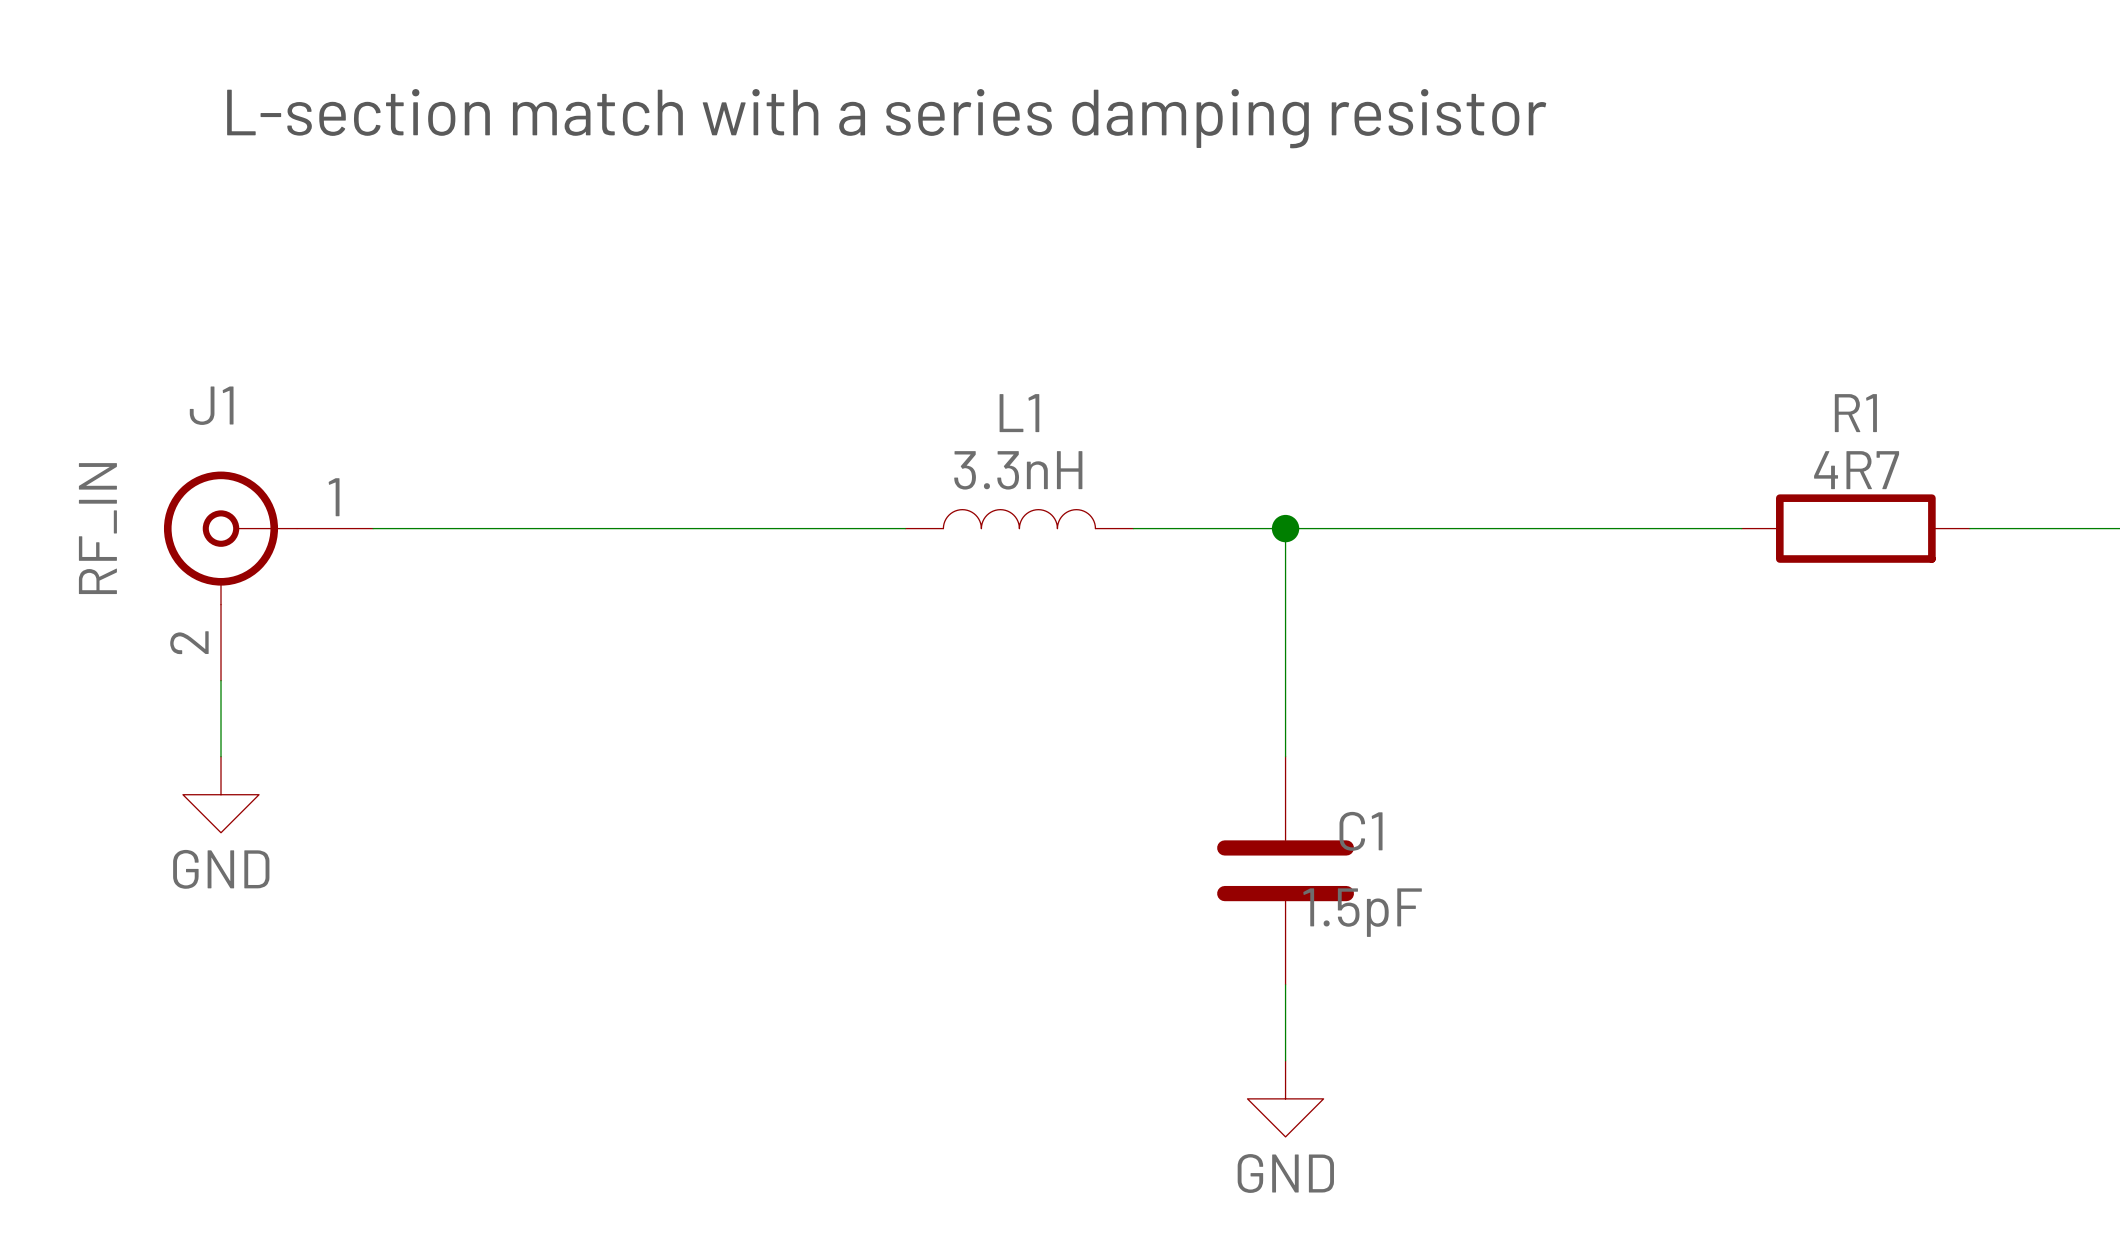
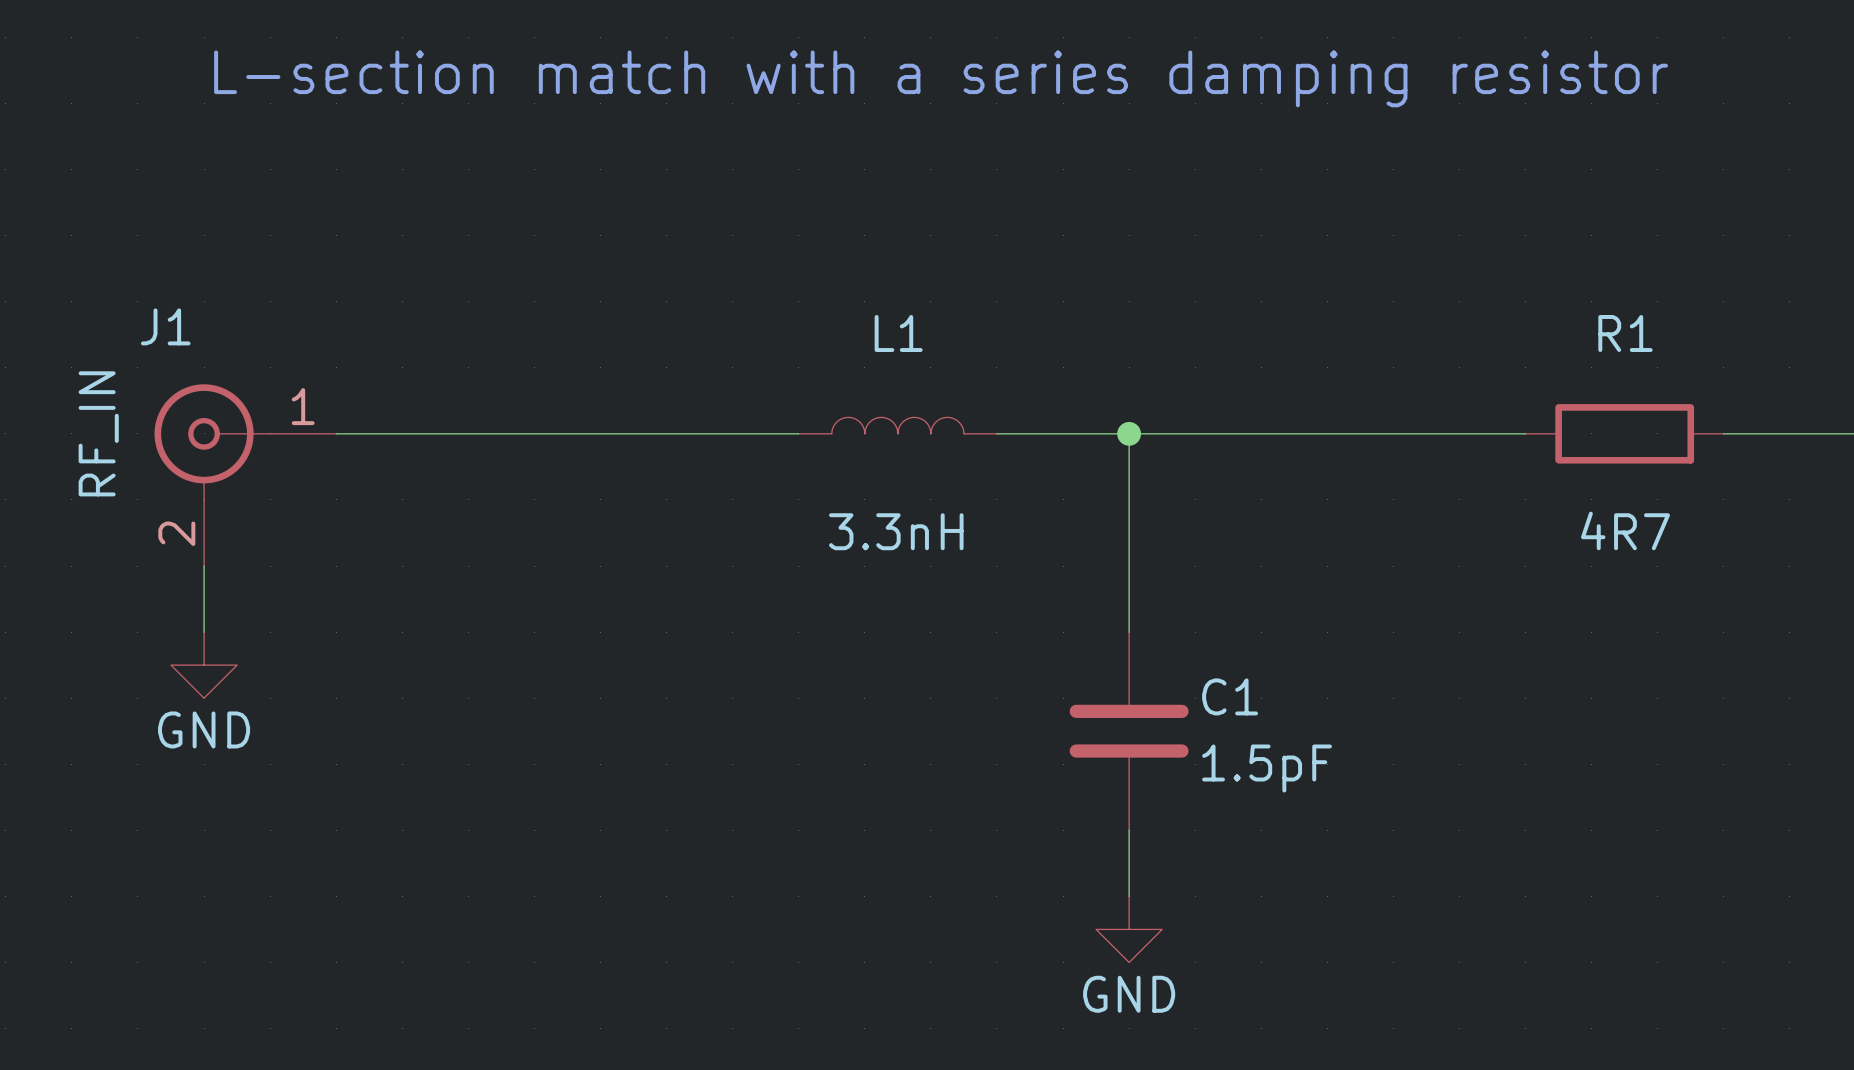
J1 name position: J1 (211, 405) -> J1 (165, 326)
L1 value position: 3.3nH (1018, 470) -> 3.3nH (896, 531)
R1 value position: 4R7 (1856, 470) -> 4R7 (1625, 530)
C1 name position: C1 (1361, 831) -> C1 (1230, 696)
C1 value position: 1.5pF (1362, 912) -> 1.5pF (1267, 768)

